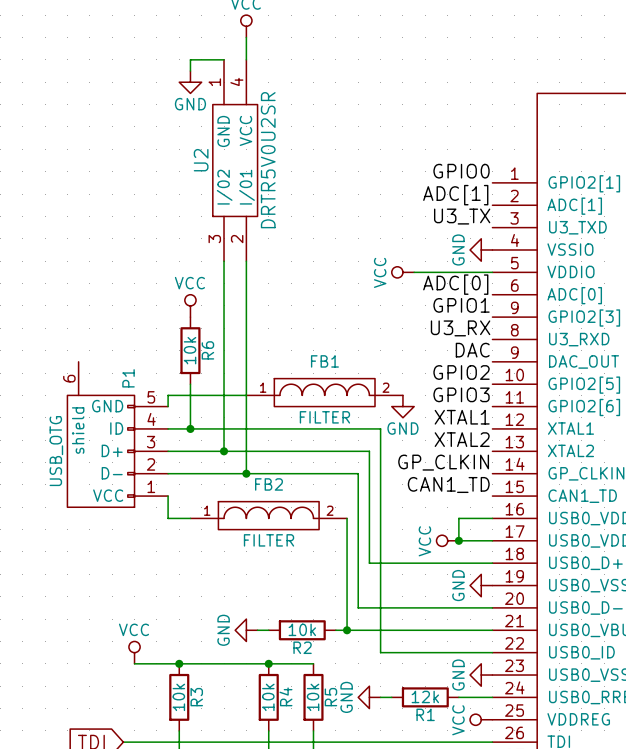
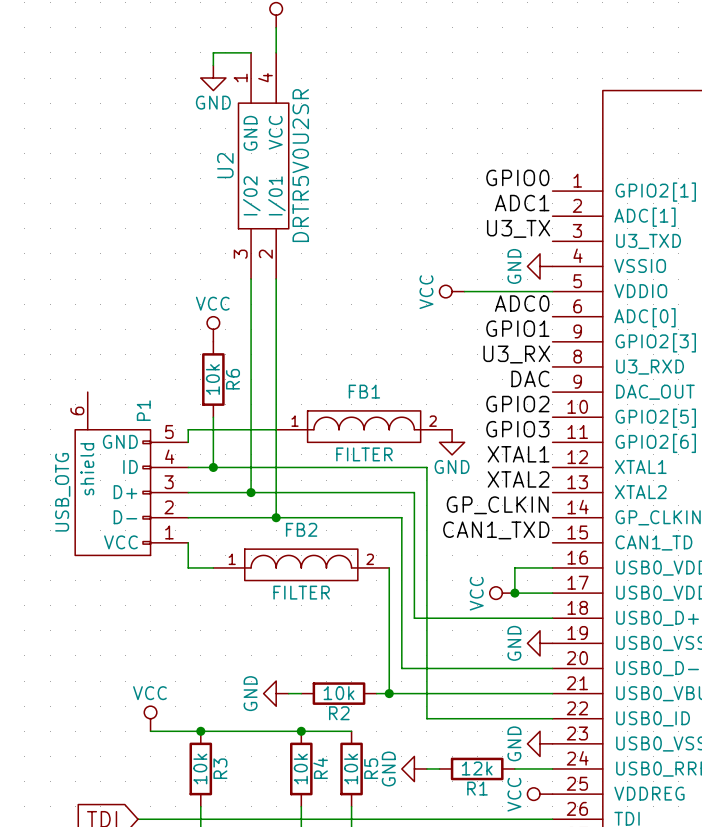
label: ADC[1] (455, 195) -> ADC1 (522, 203)
label: ADC[0] (455, 284) -> ADC0 (522, 303)
label: CAN1_TD (448, 484) -> CAN1_TXD (496, 530)

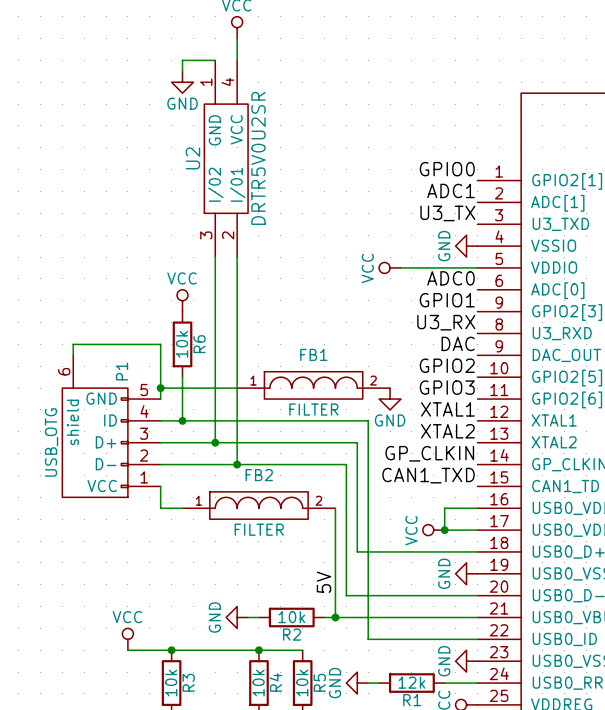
wire: none -> (73, 355) (73, 344) (160, 344) (160, 388)
junction: none -> (160, 388)
label: none -> 5V (324, 582)

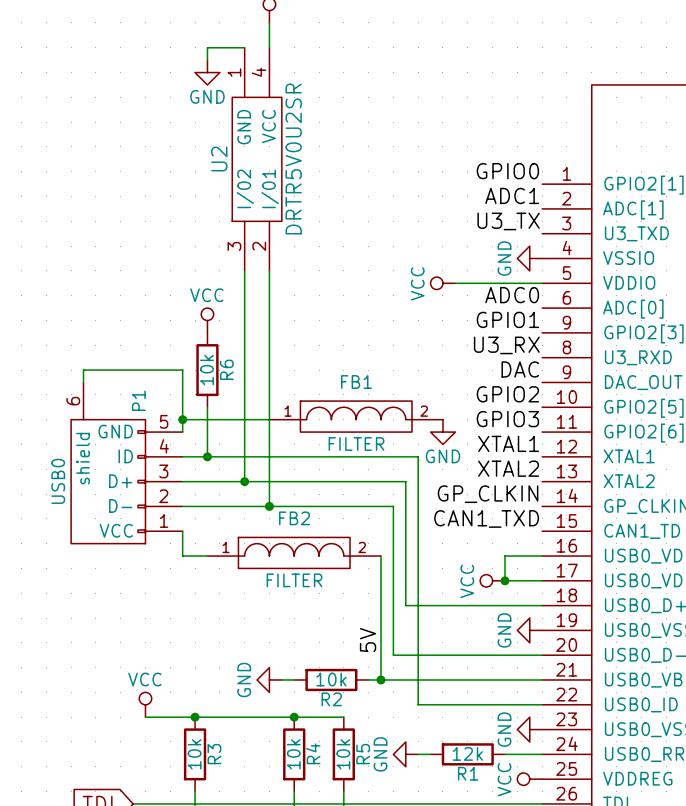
P1 value: USB_OTG (51, 442) -> USB0 (58, 481)

